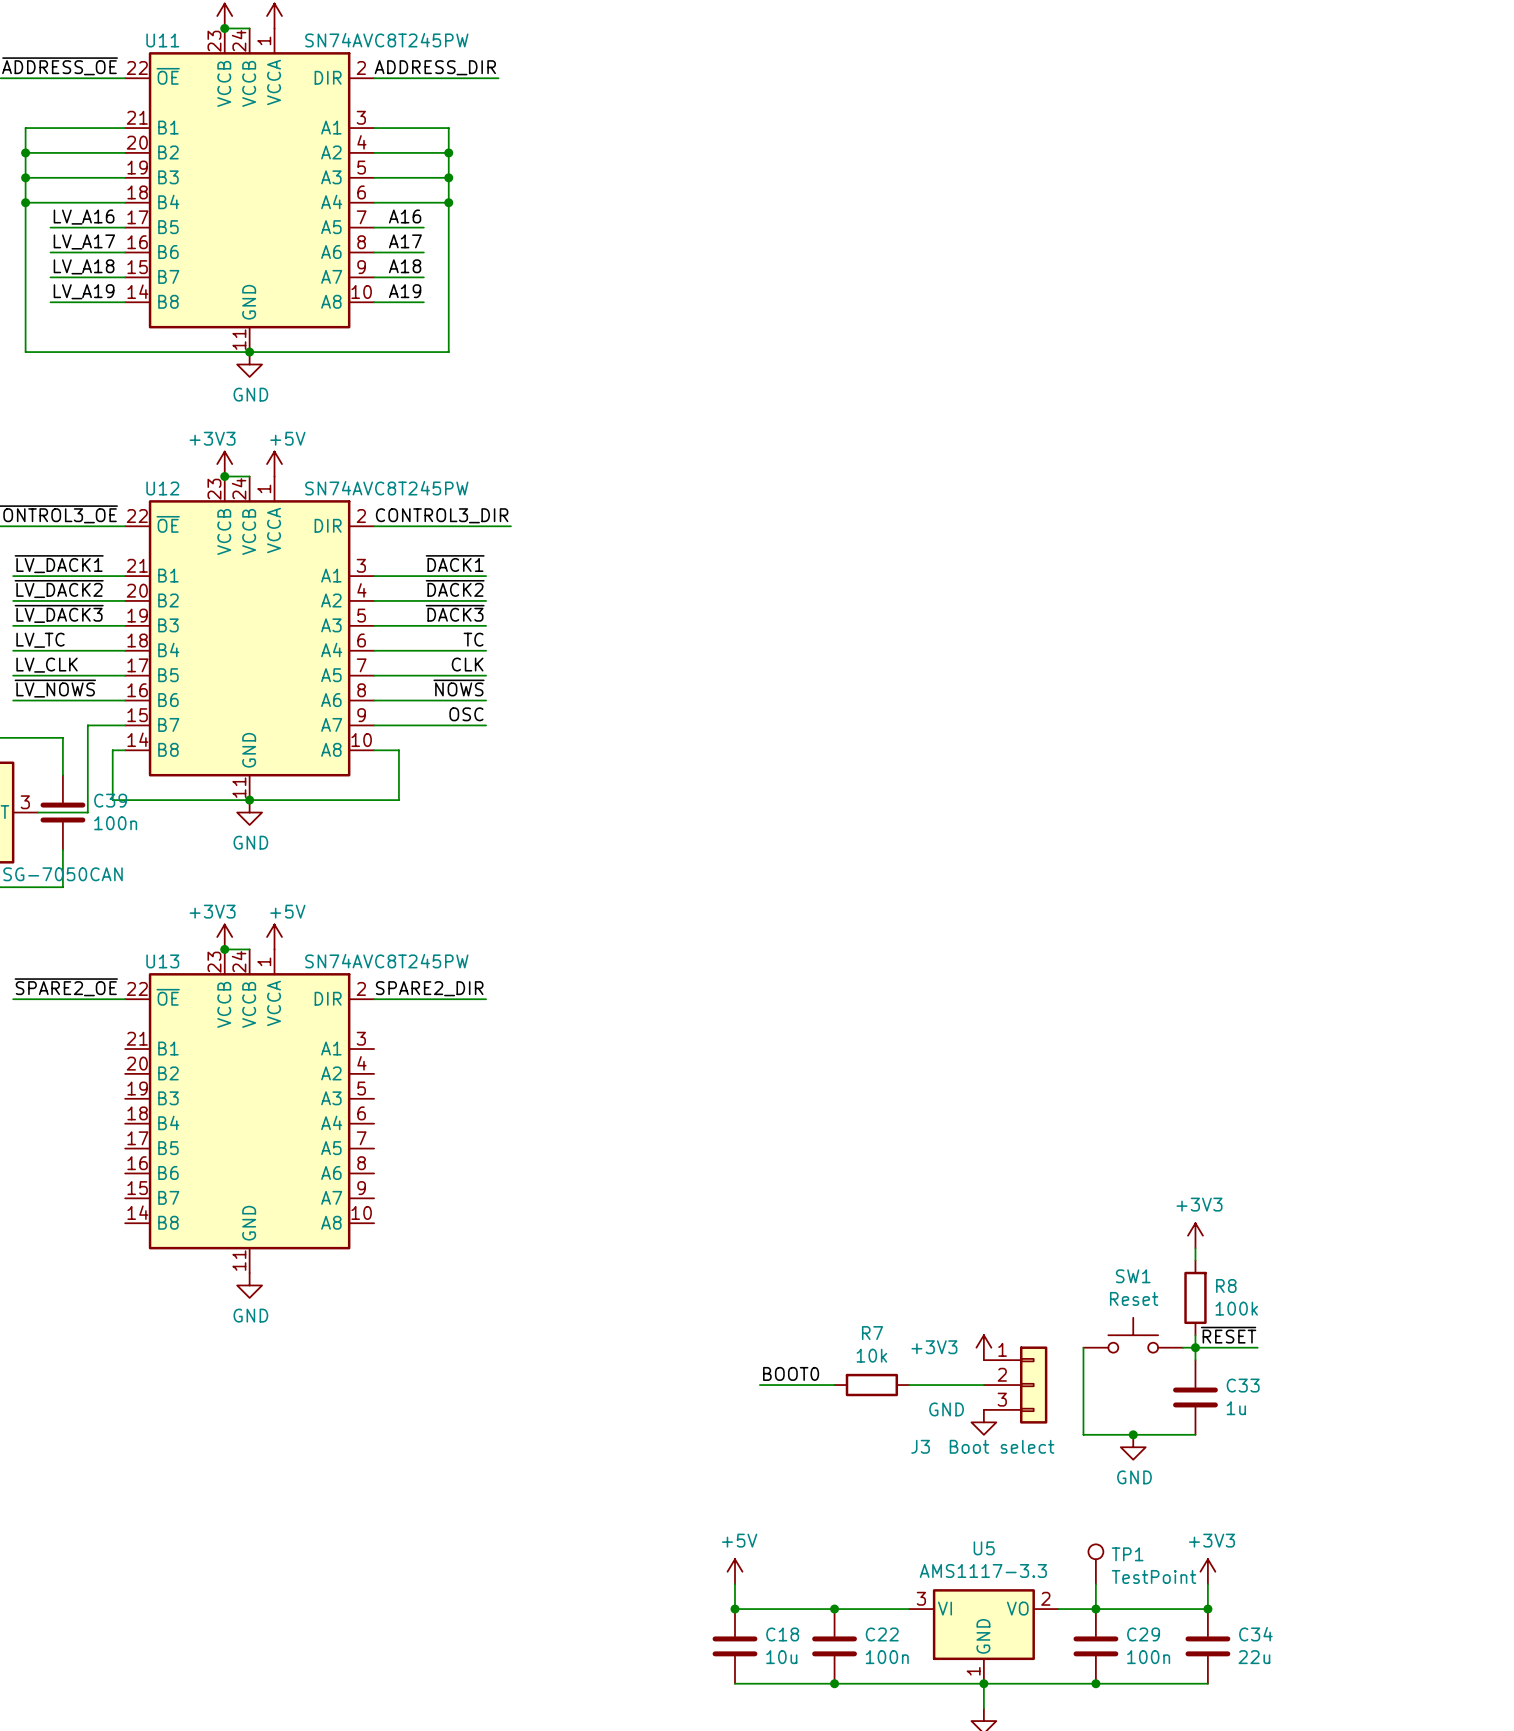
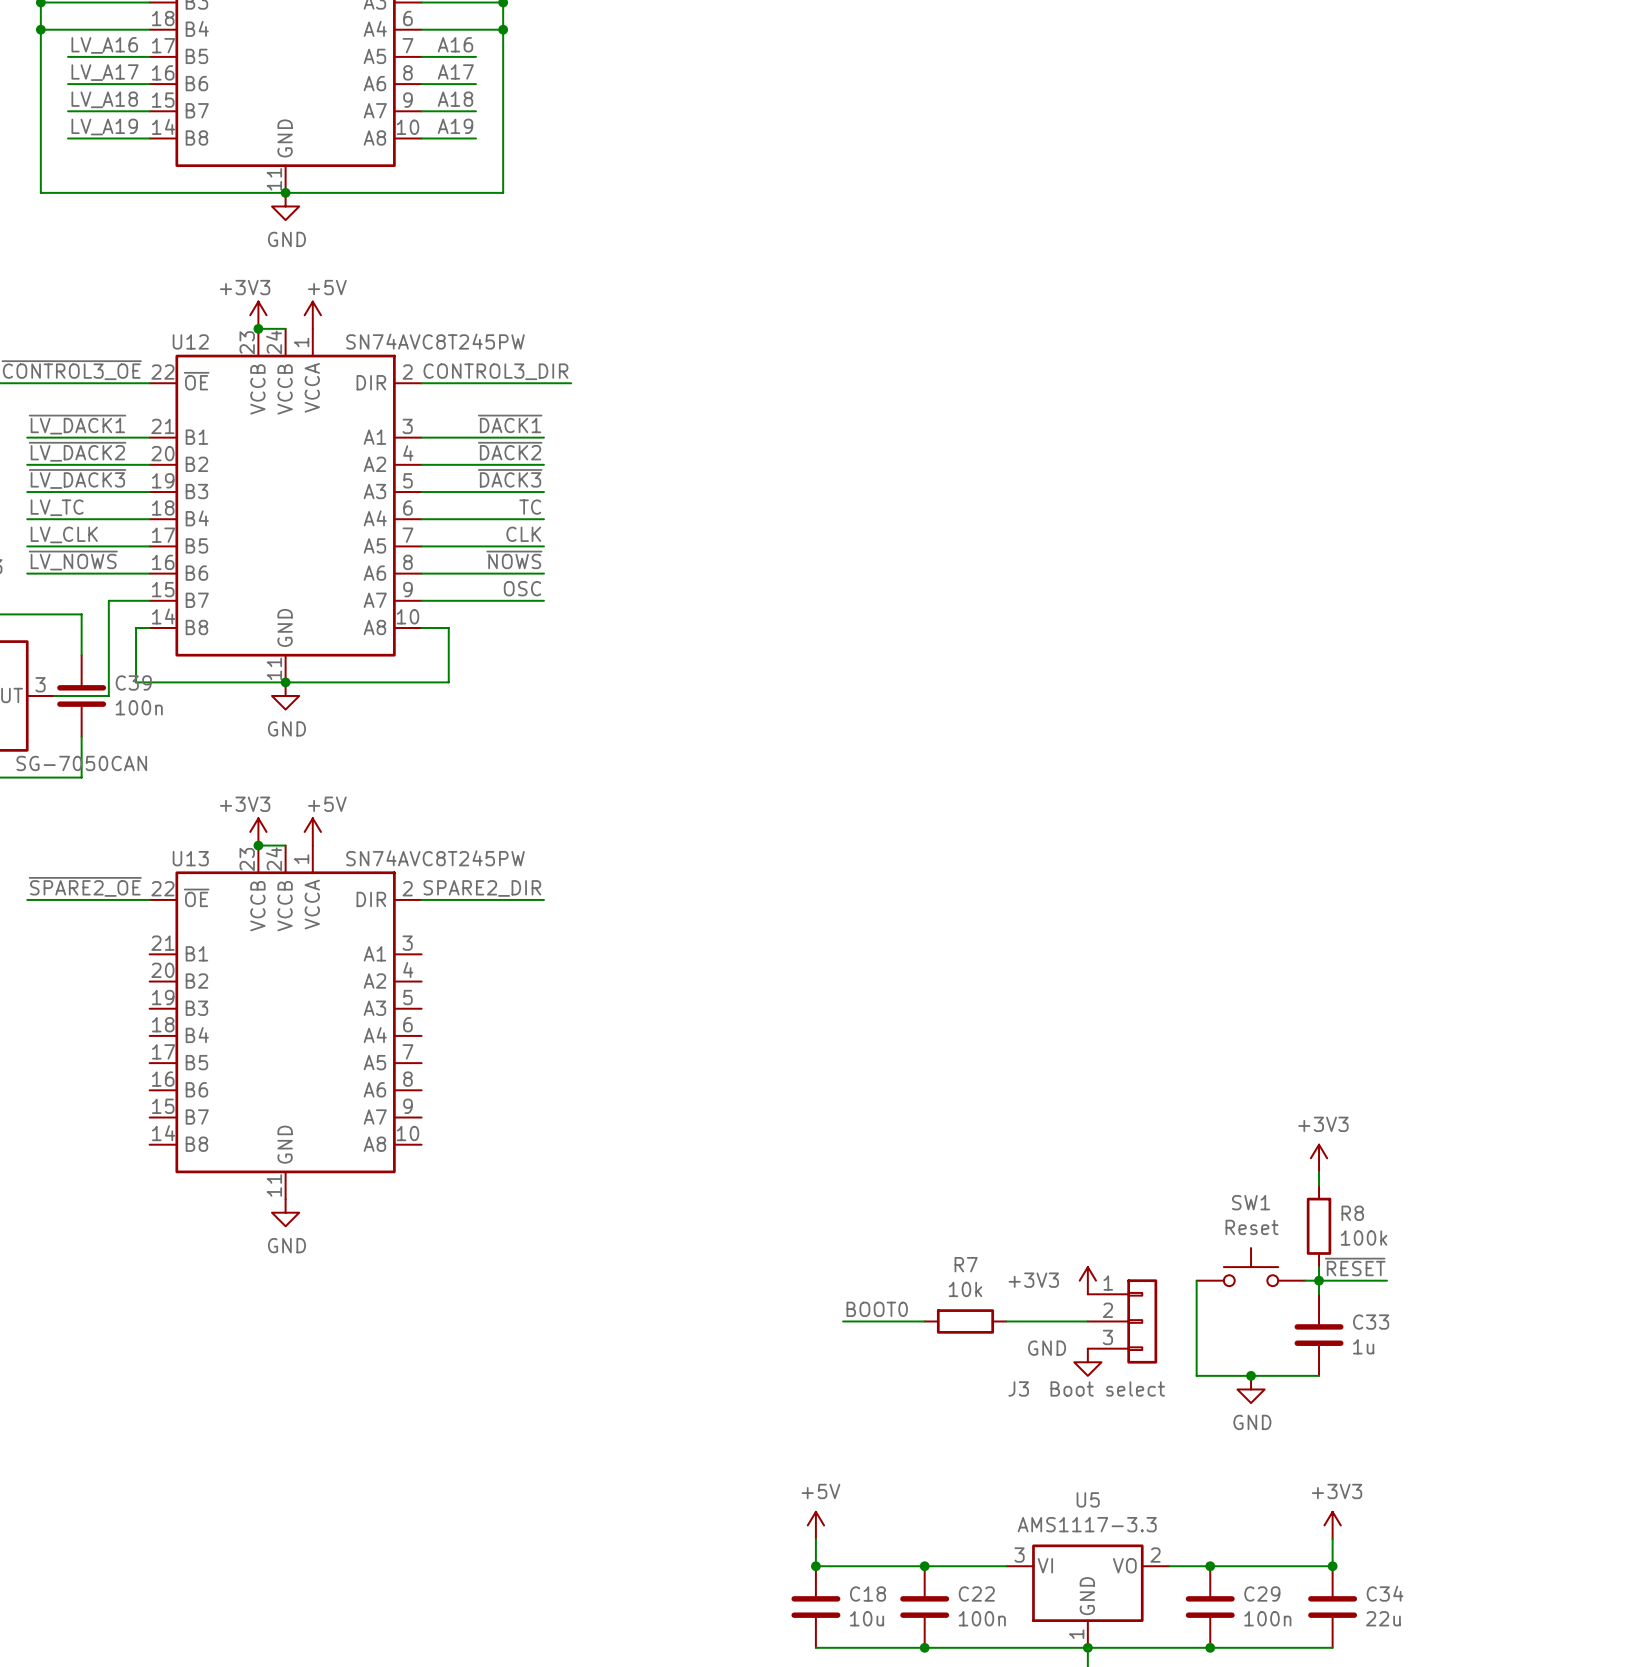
TP1: TestPoint (1095, 1564) -> none
wire: (1095, 1584) (1095, 1609) -> none

